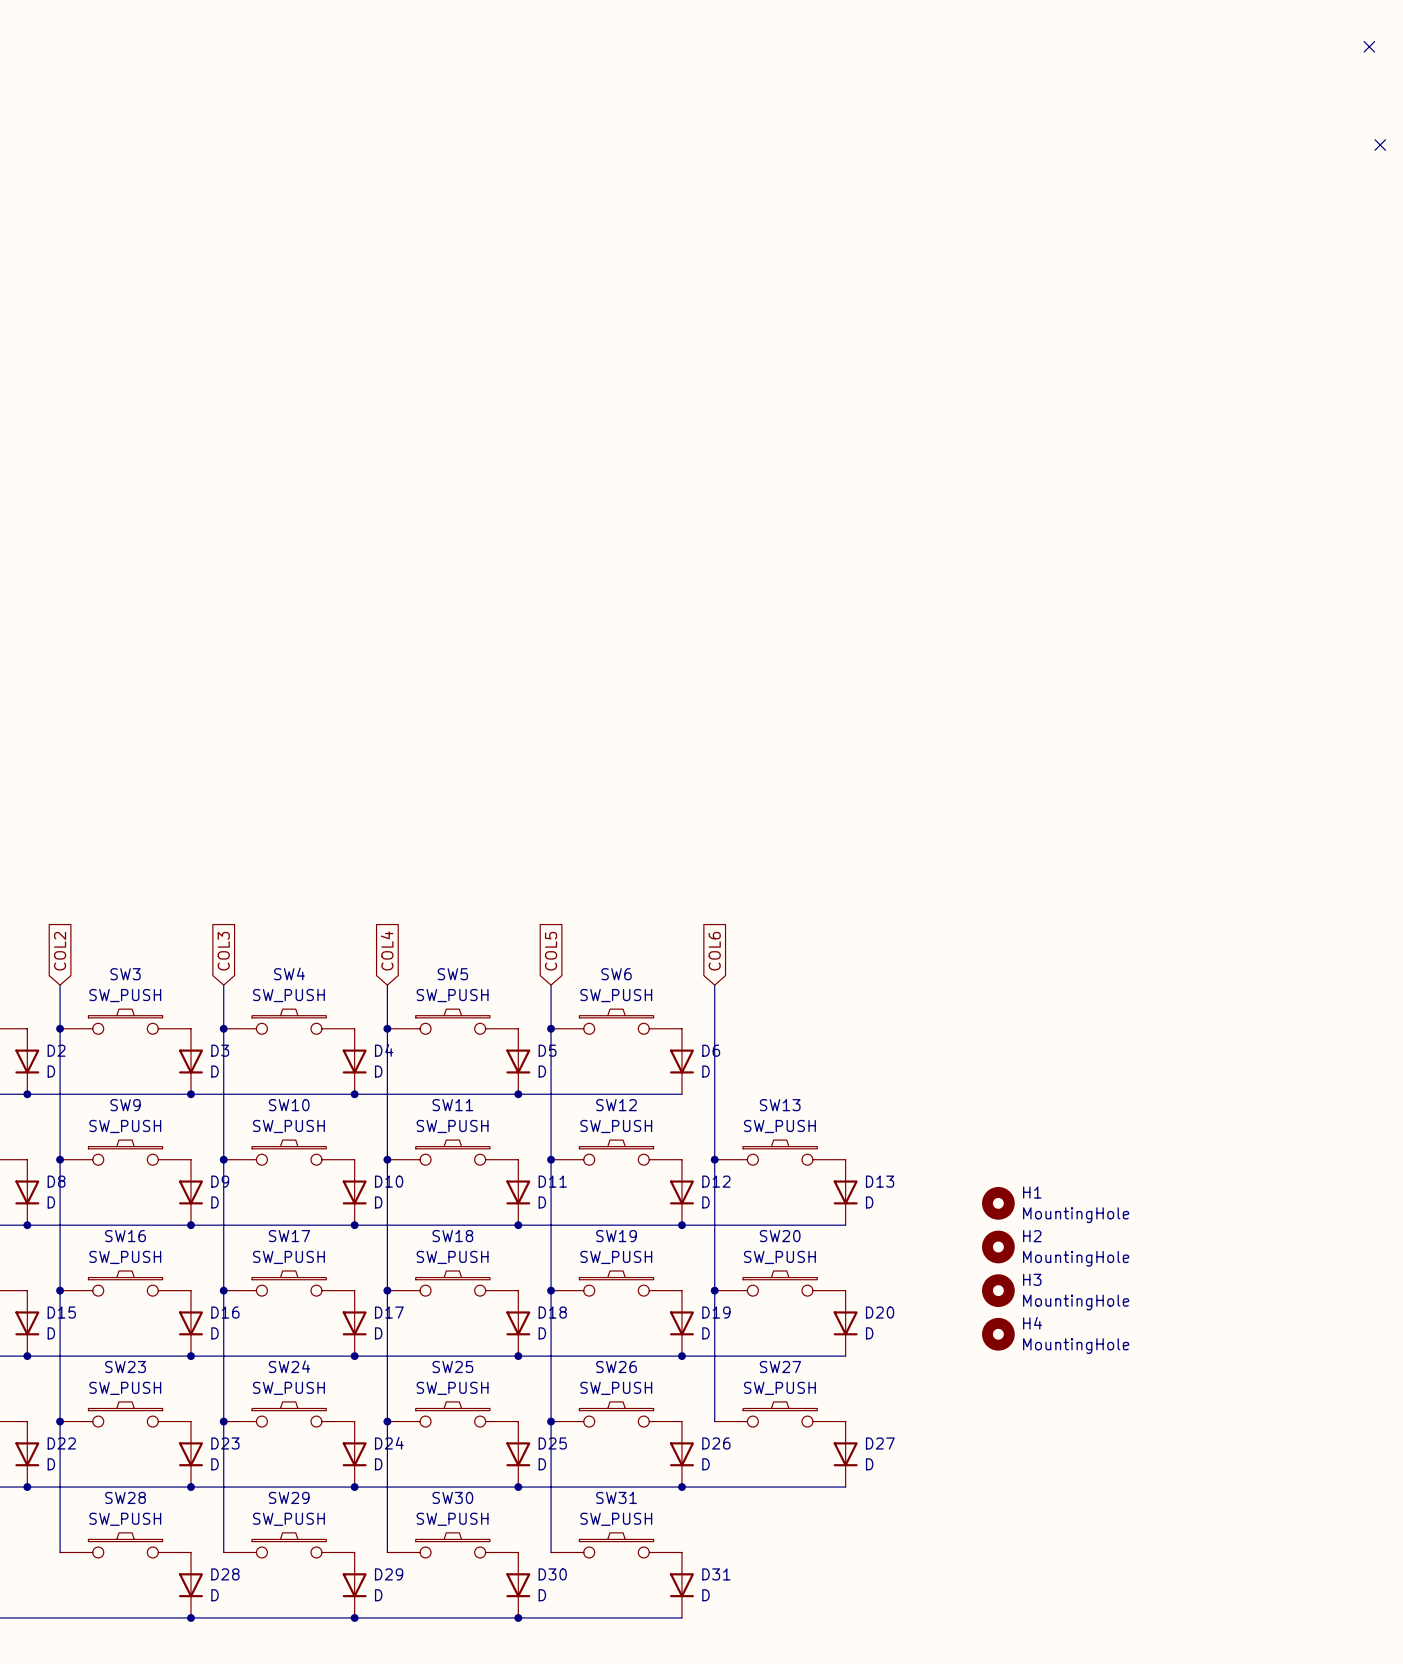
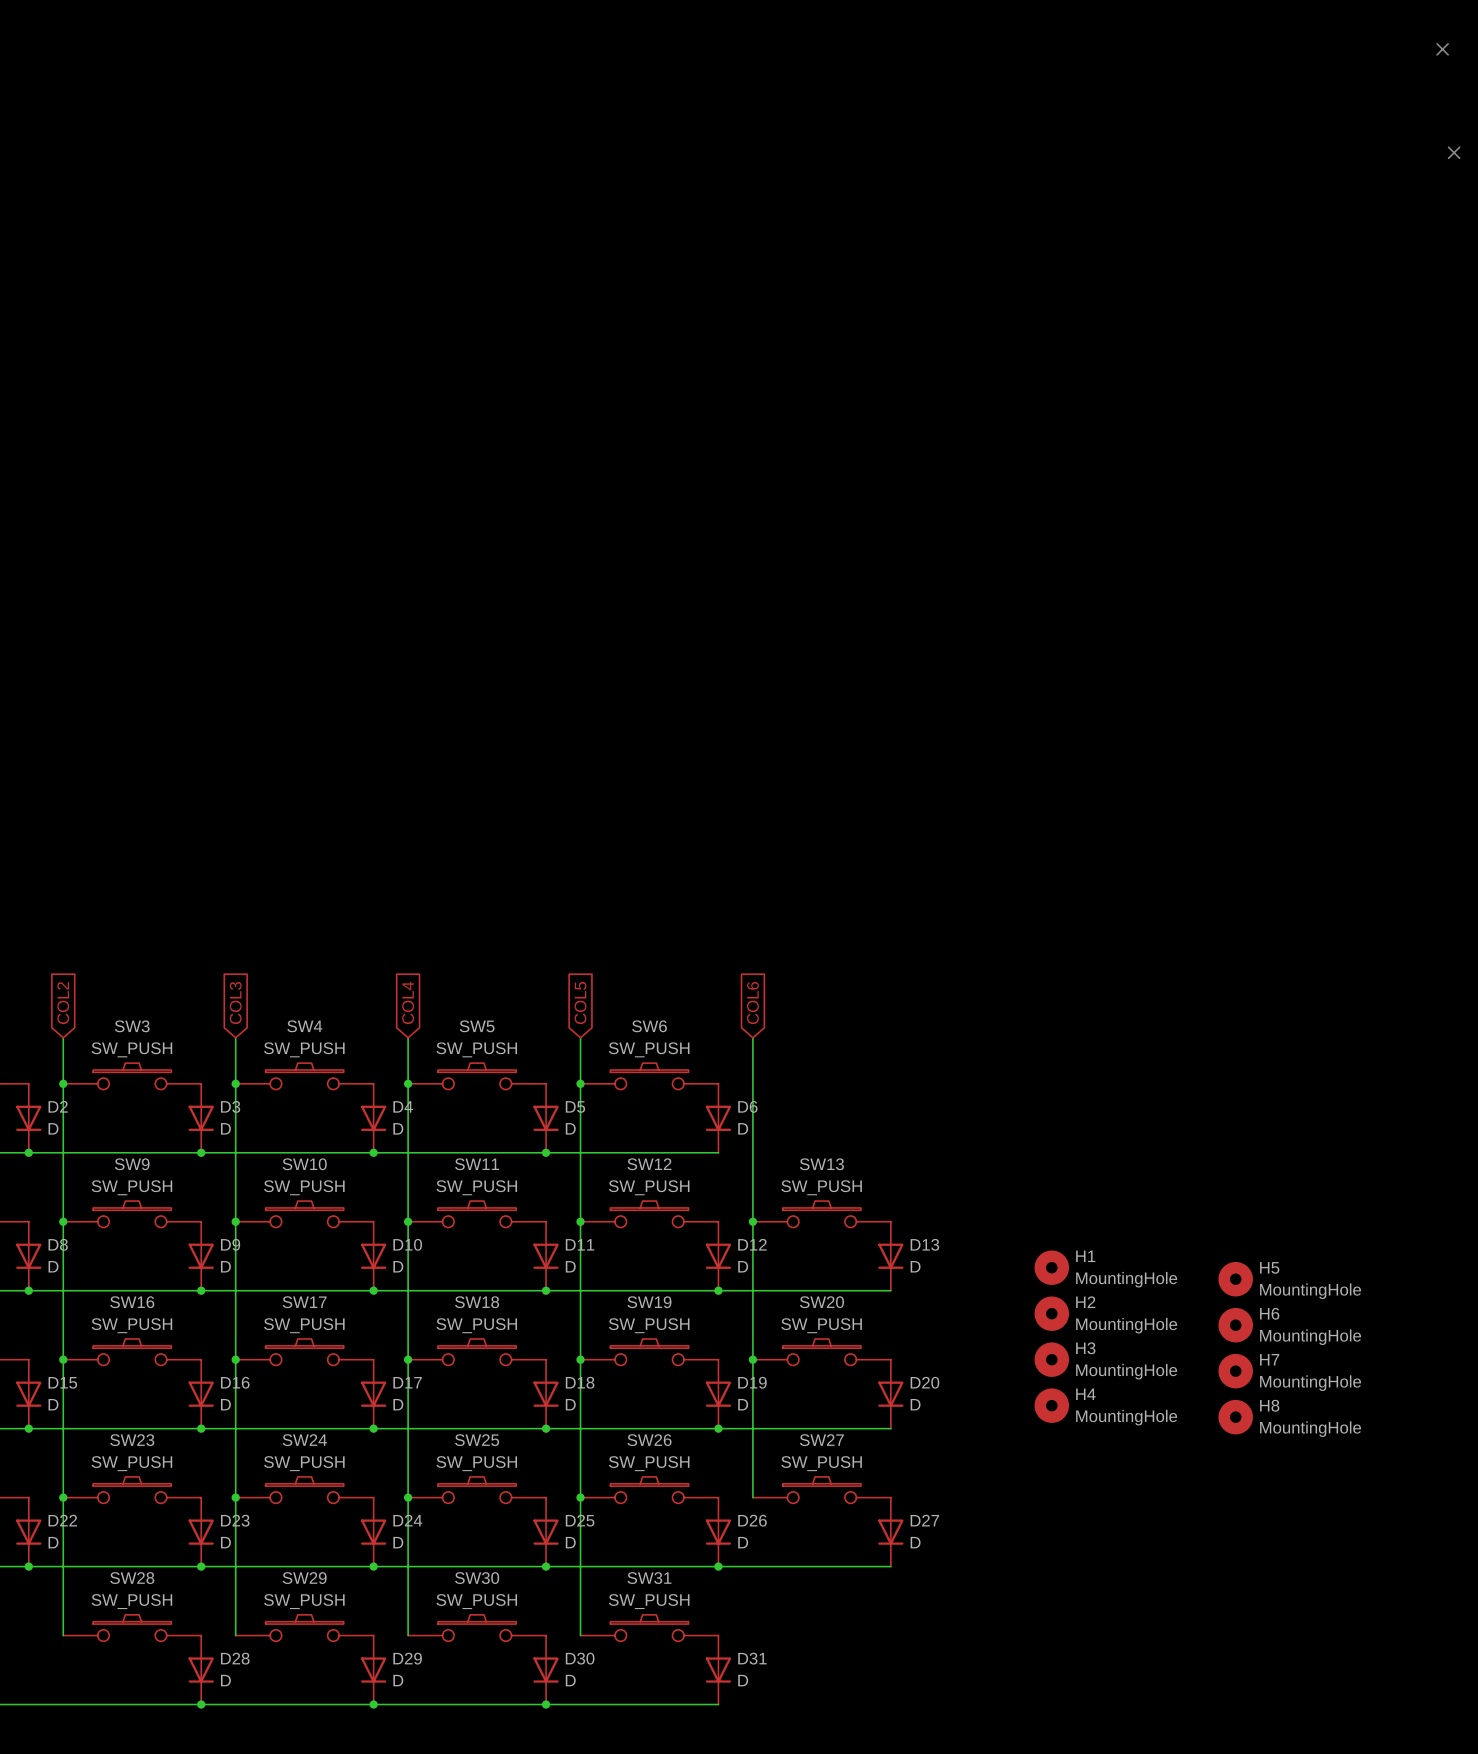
H5: none -> MountingHole (1235, 1279)
H6: none -> MountingHole (1235, 1325)
H7: none -> MountingHole (1235, 1371)
H8: none -> MountingHole (1235, 1417)

